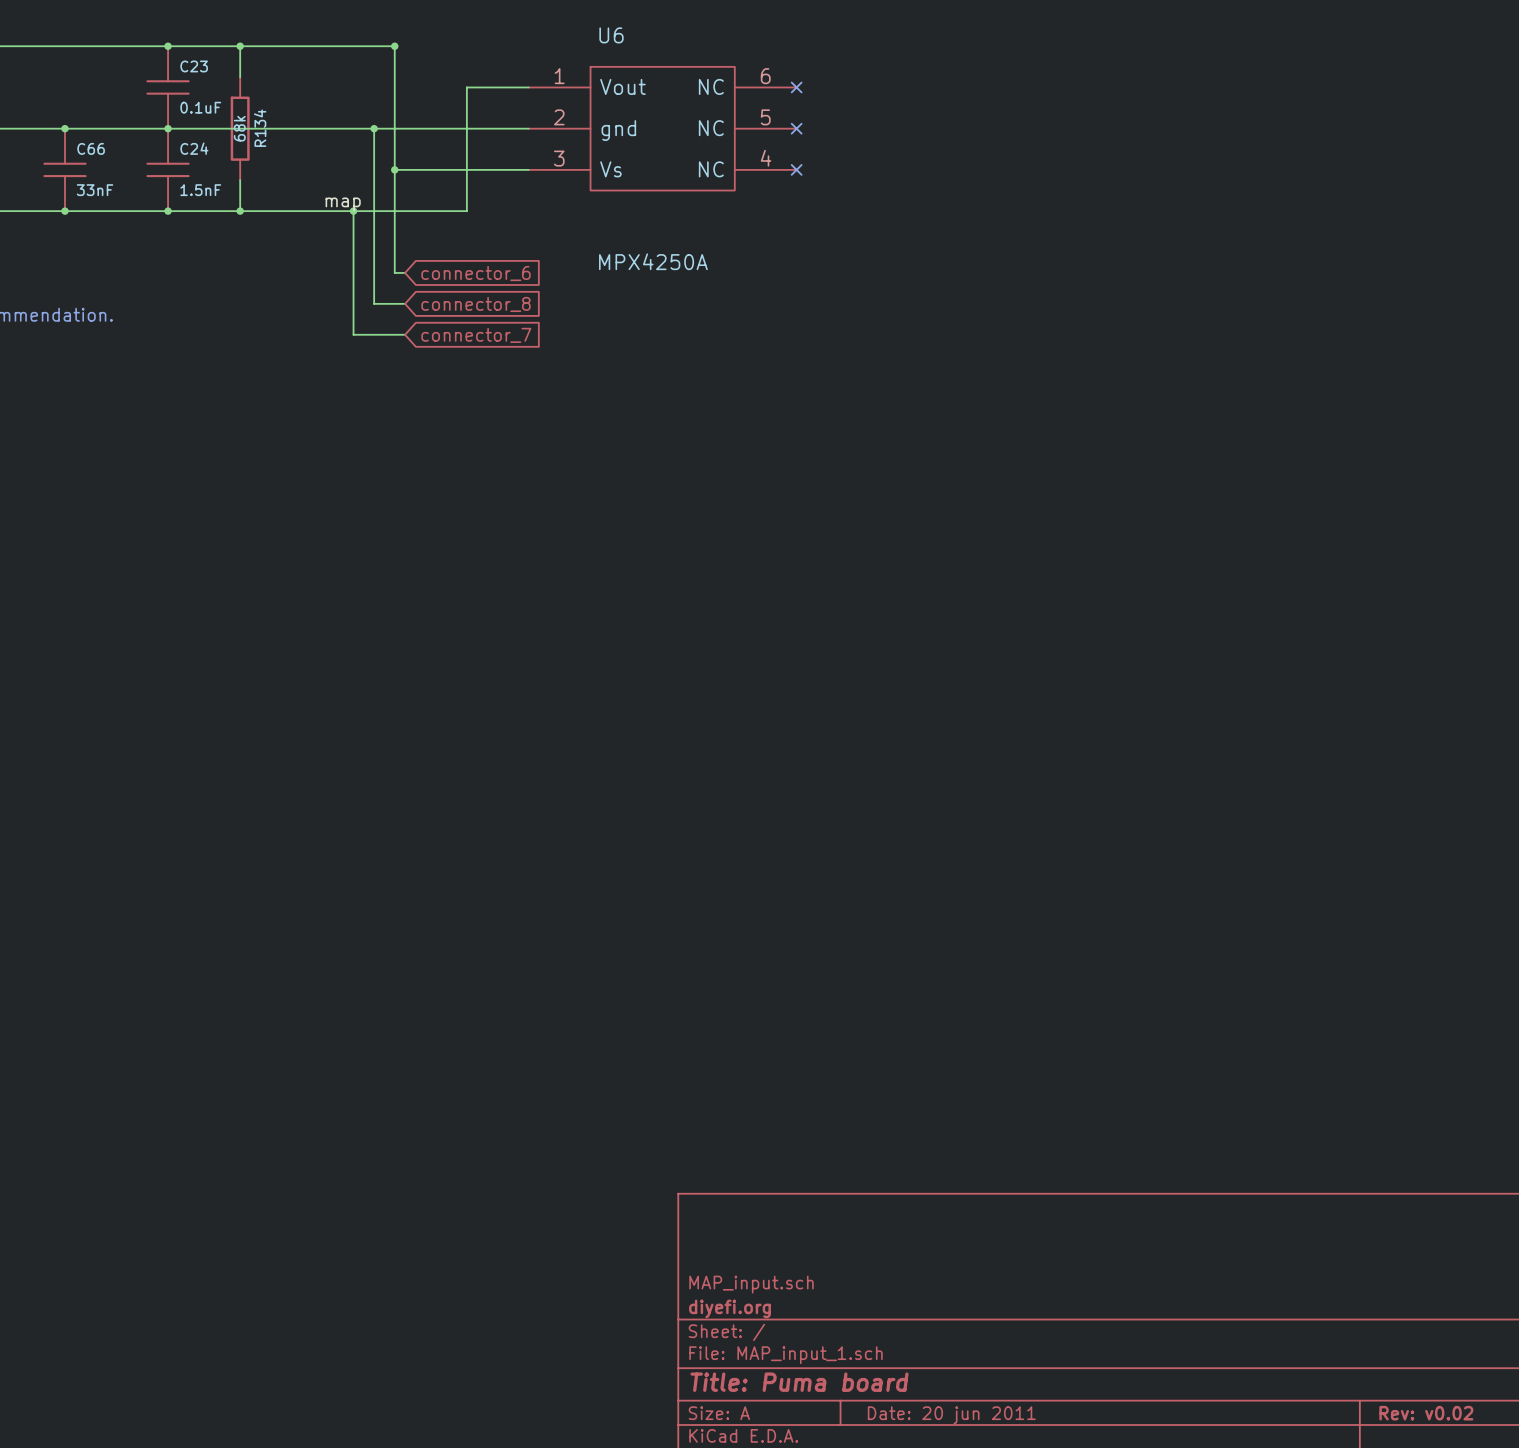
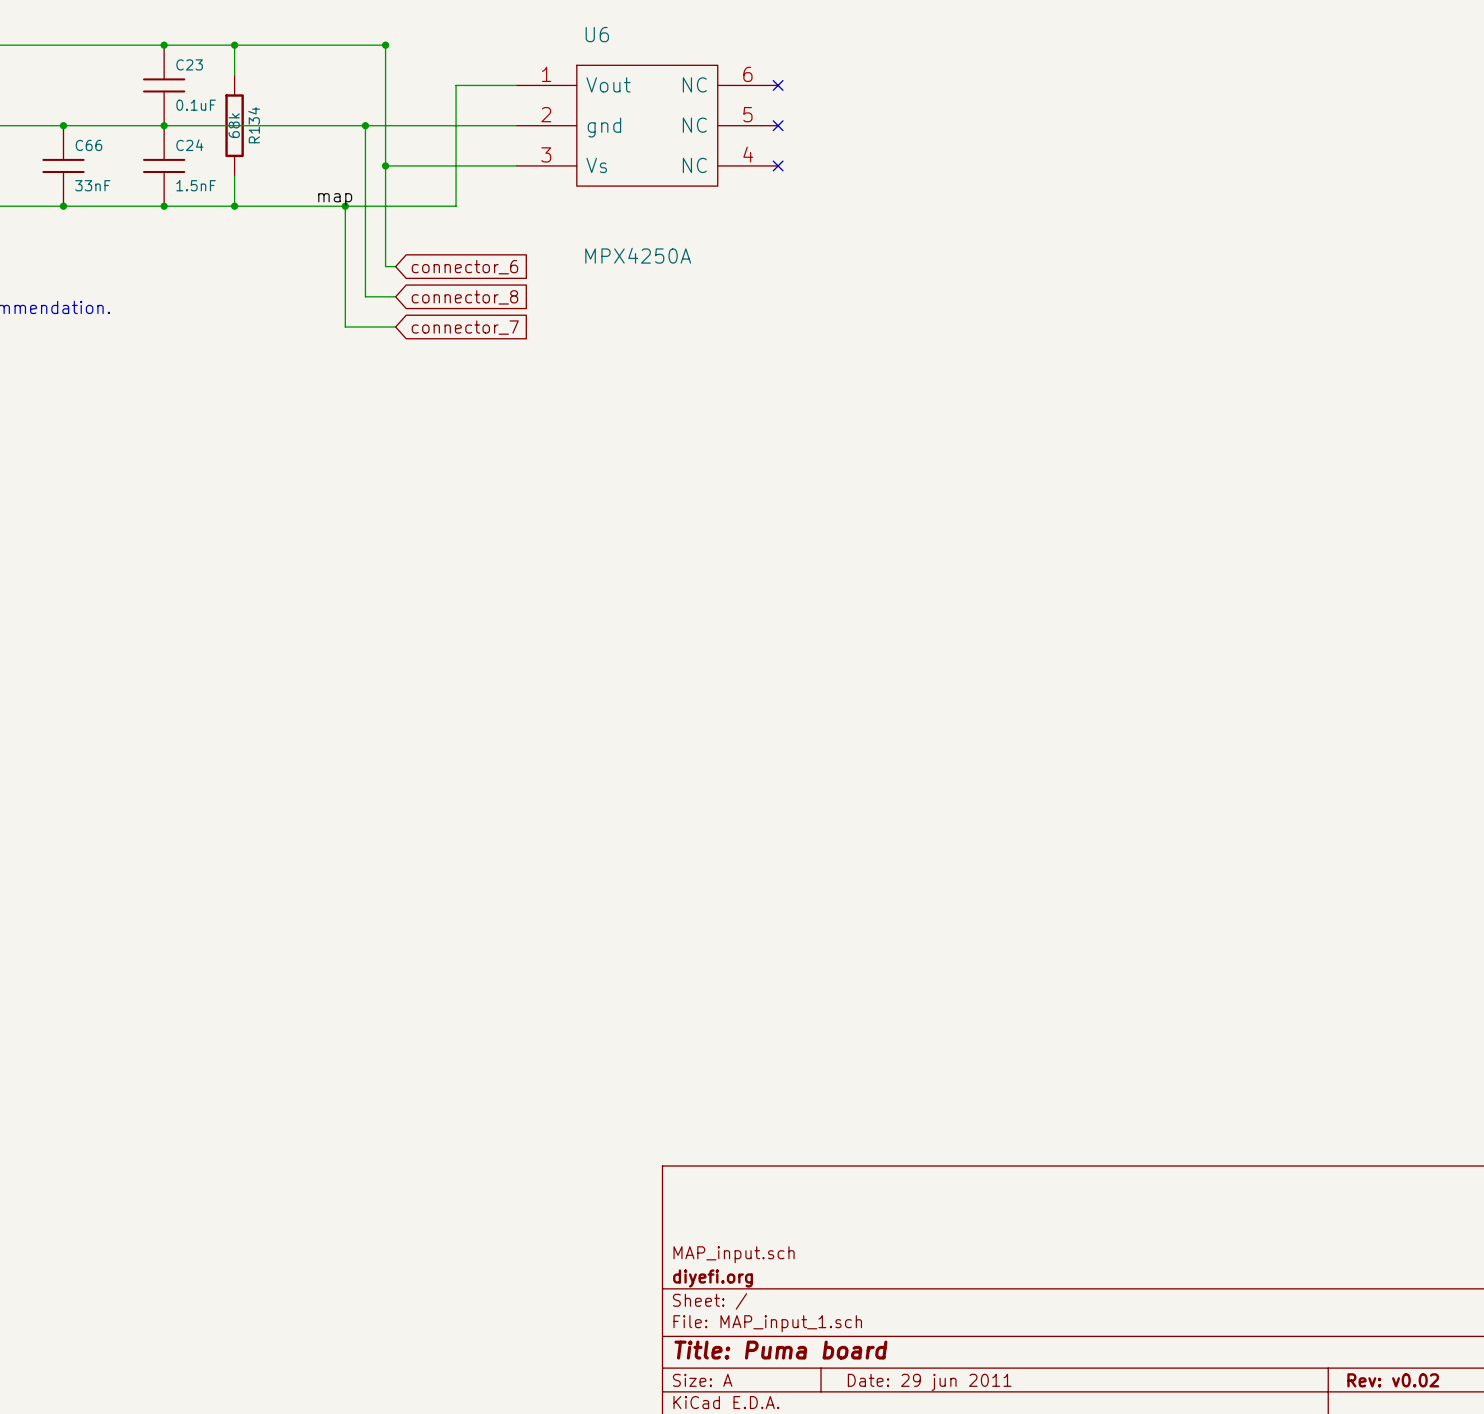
title block: Date: 20 jun 2011 (951, 1415) -> Date: 29 jun 2011 (929, 1382)

